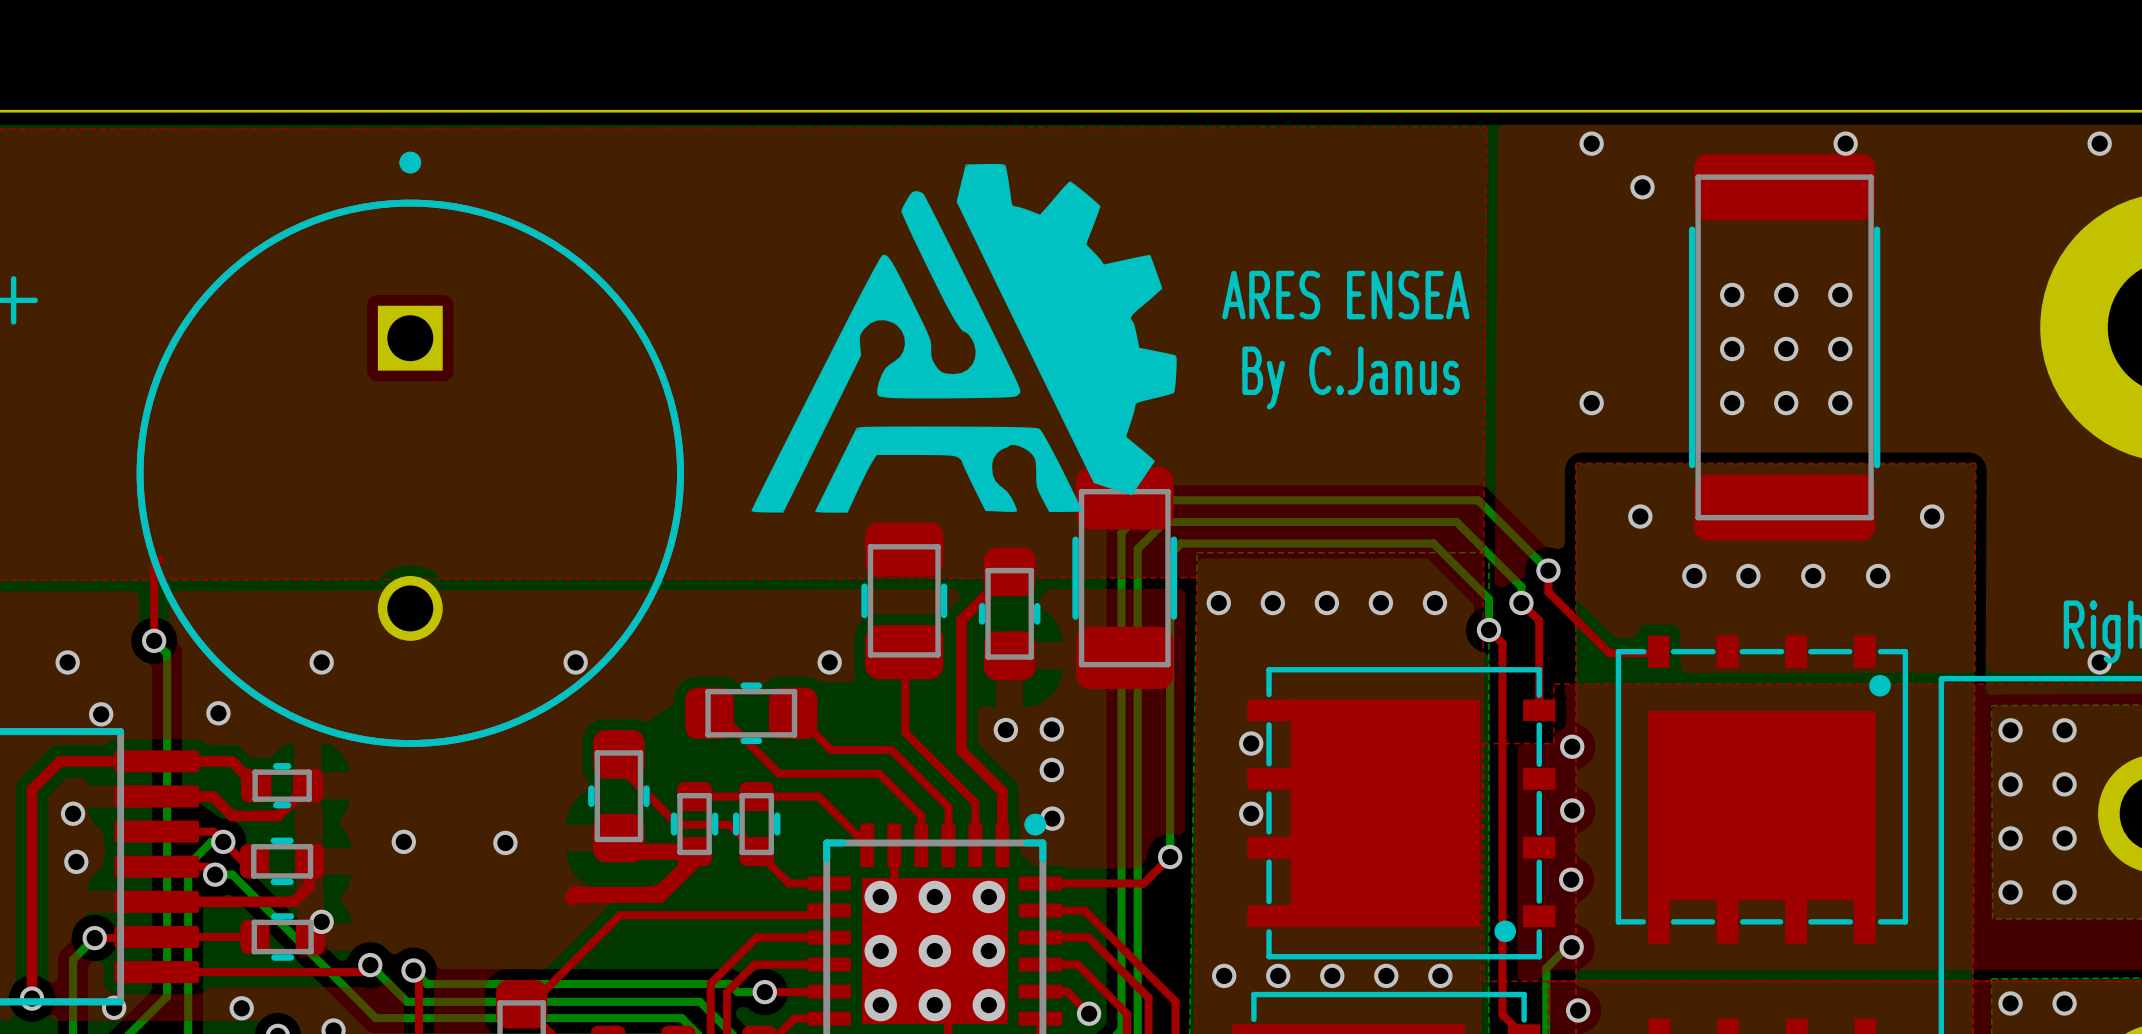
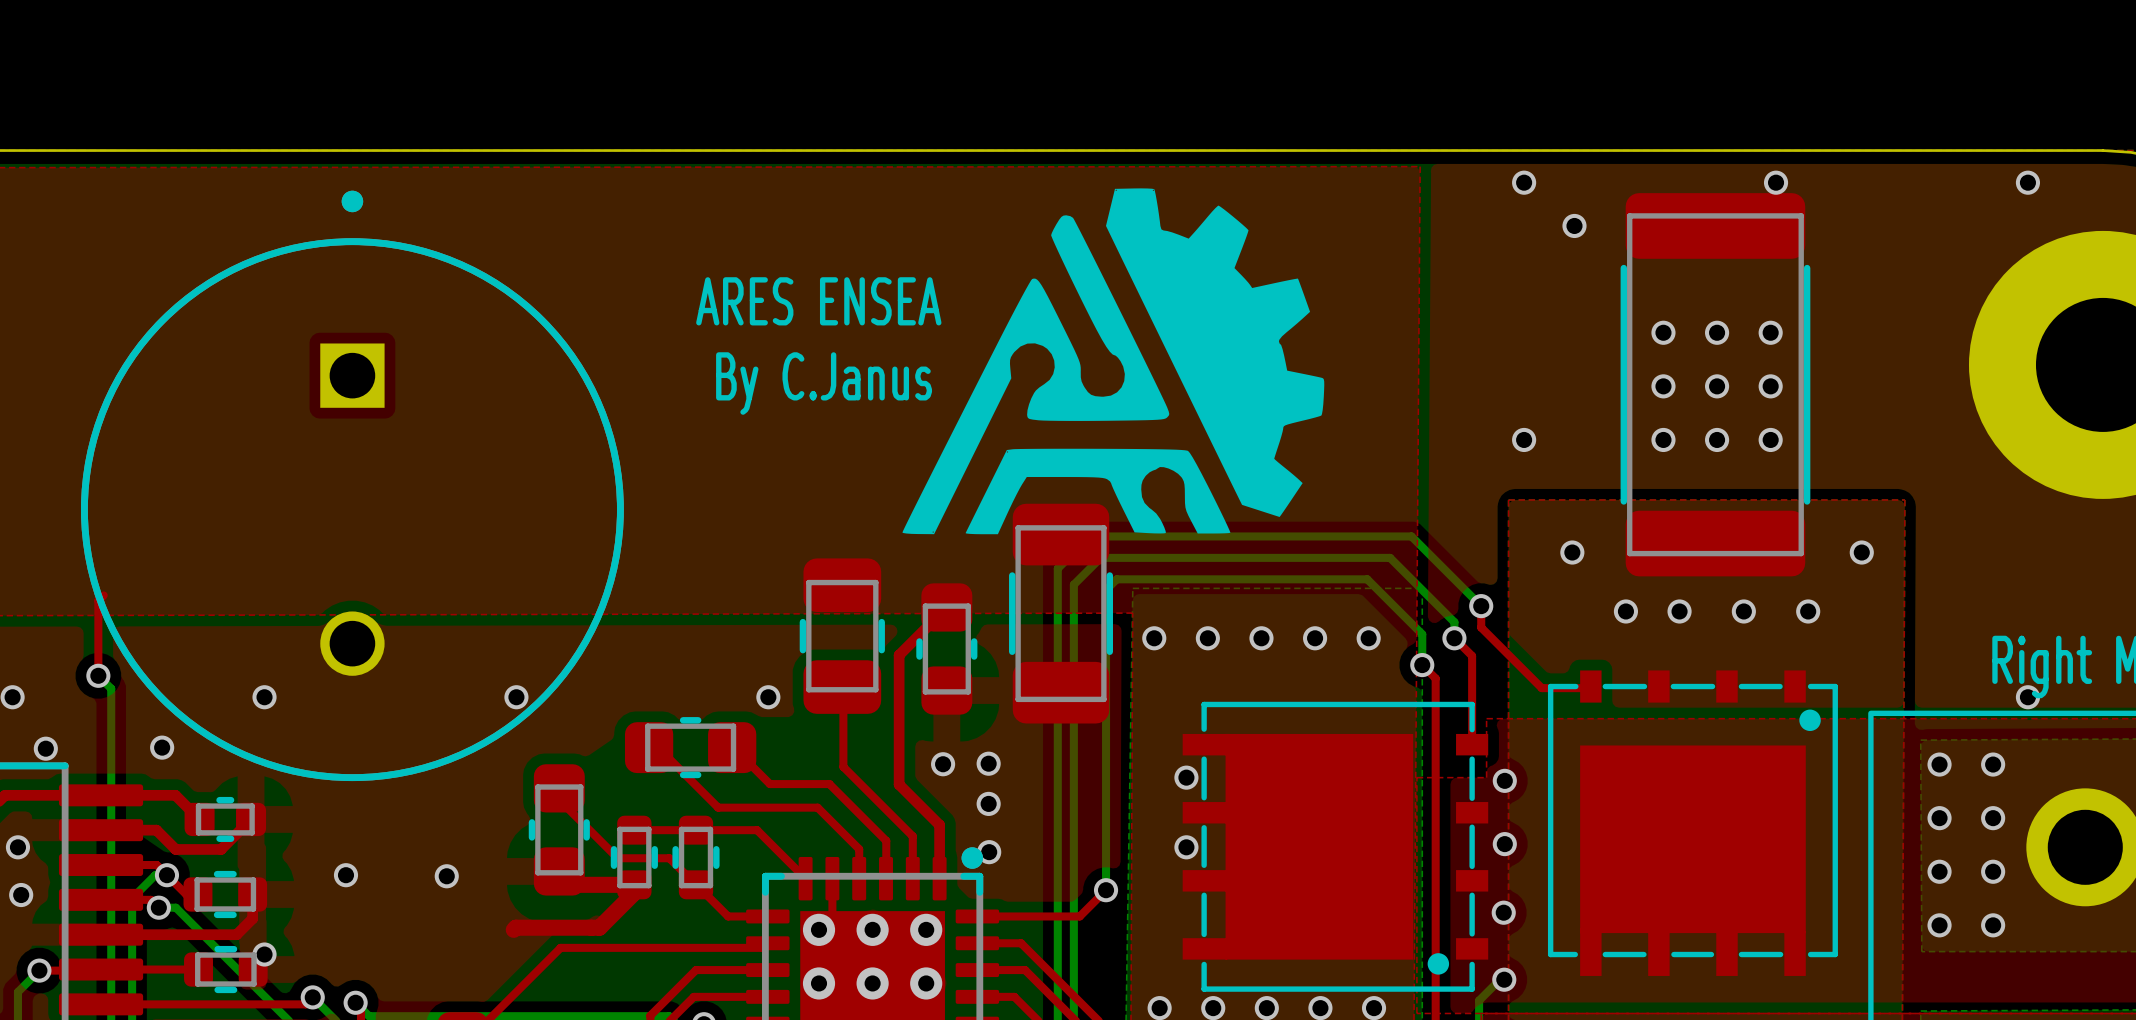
text position: ARES ENSEA (1345, 295) -> ARES ENSEA (818, 301)
drawing position: (964, 338) -> (1113, 361)
text position: By C.Janus (1351, 377) -> By C.Janus (824, 383)

